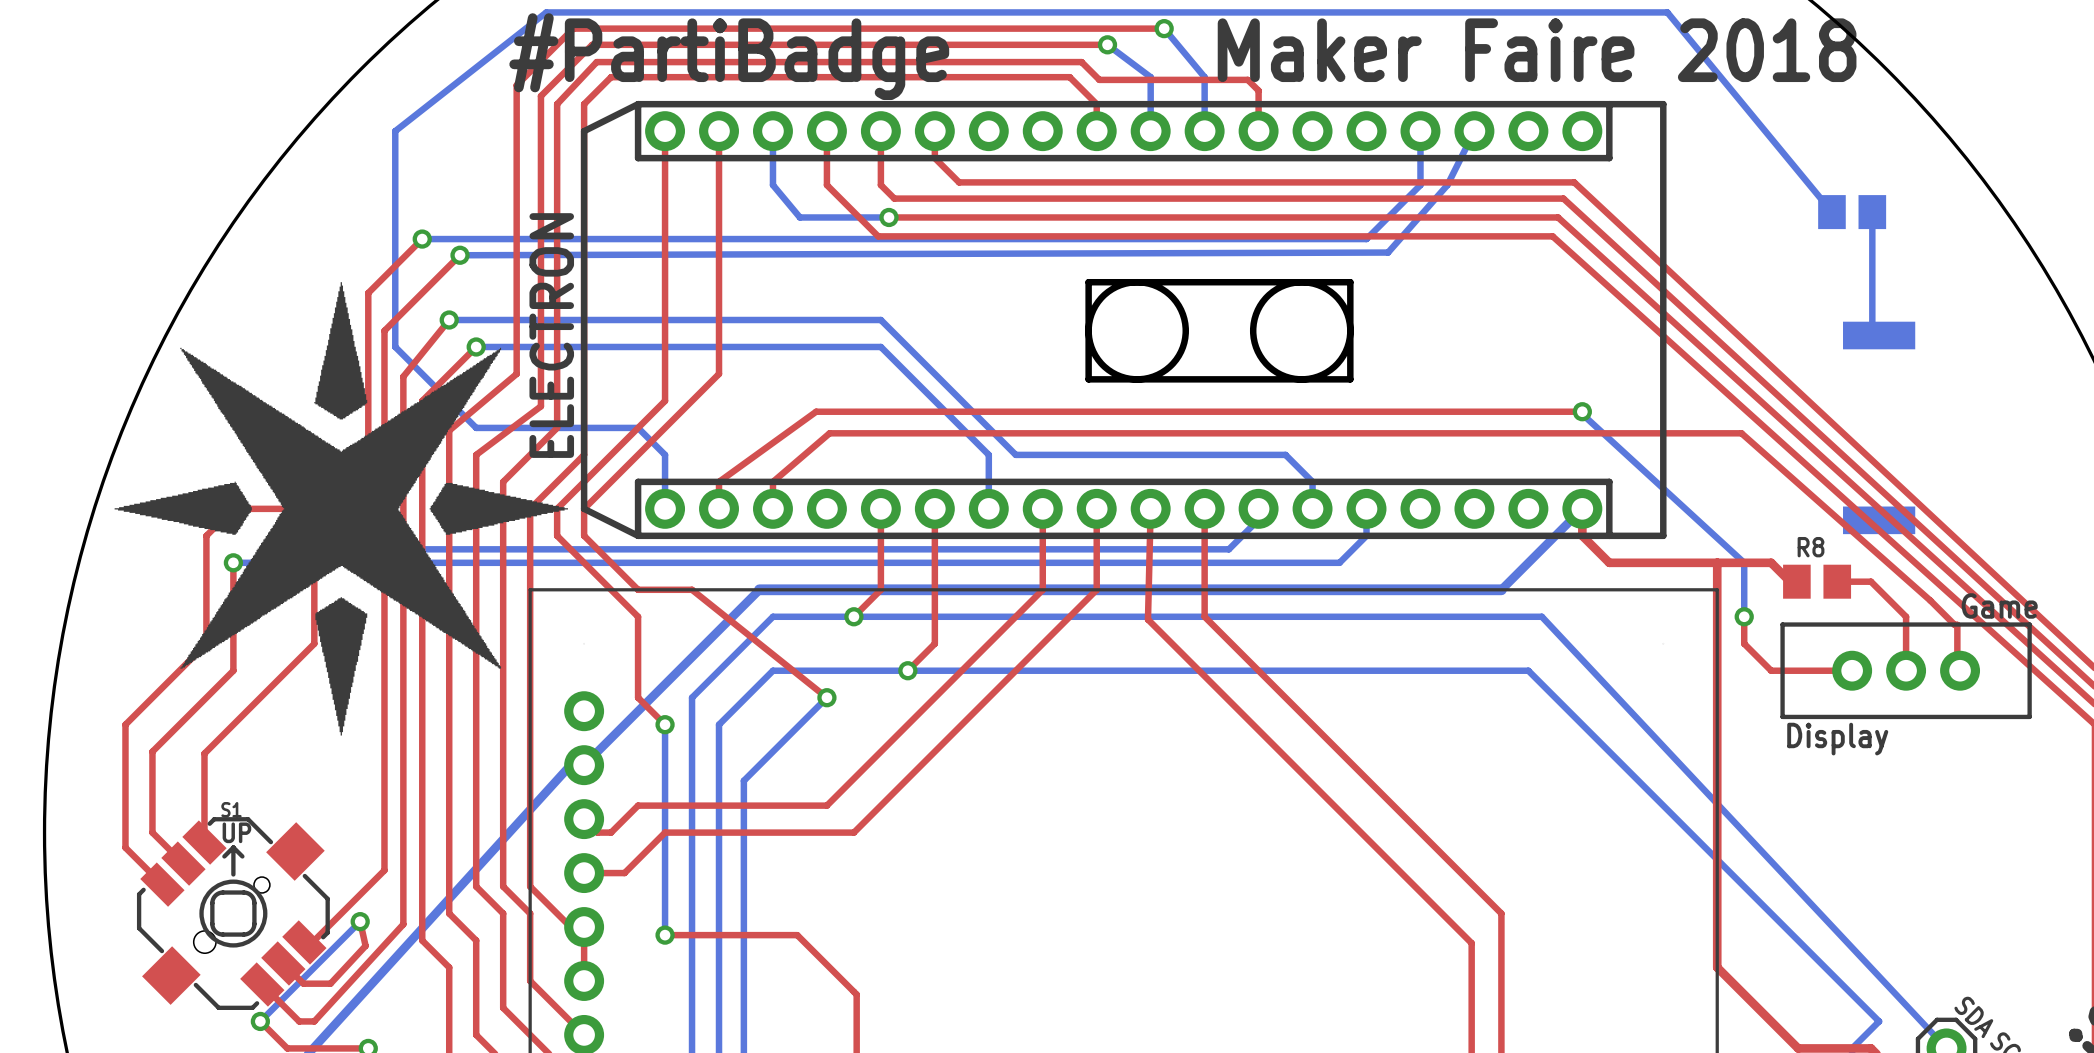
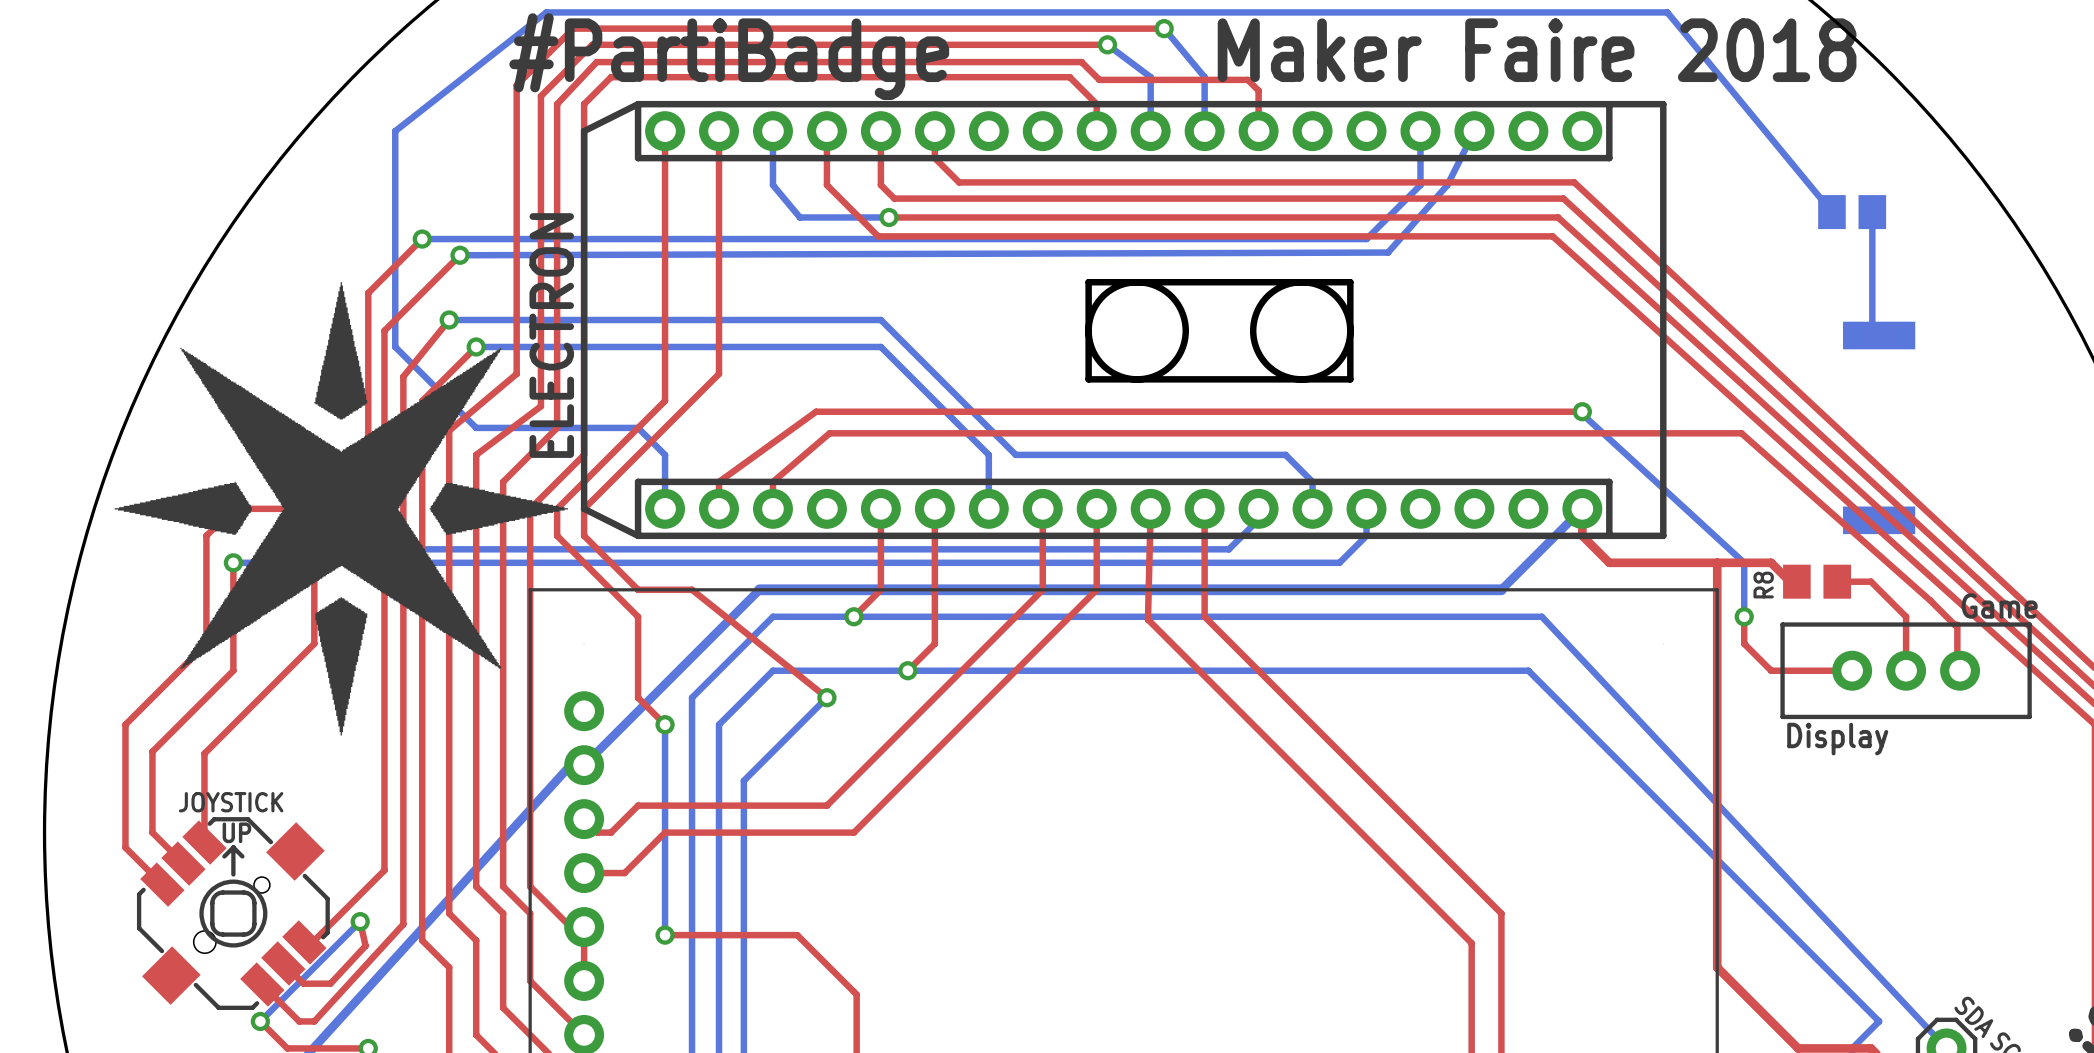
R8 name rotation: 0° (1811, 547) -> 90° counterclockwise (1763, 585)
R8 name position: R8 (1811, 547) -> R8 (1763, 585)
S1 name: S1 (231, 809) -> JOYSTICK (231, 802)

